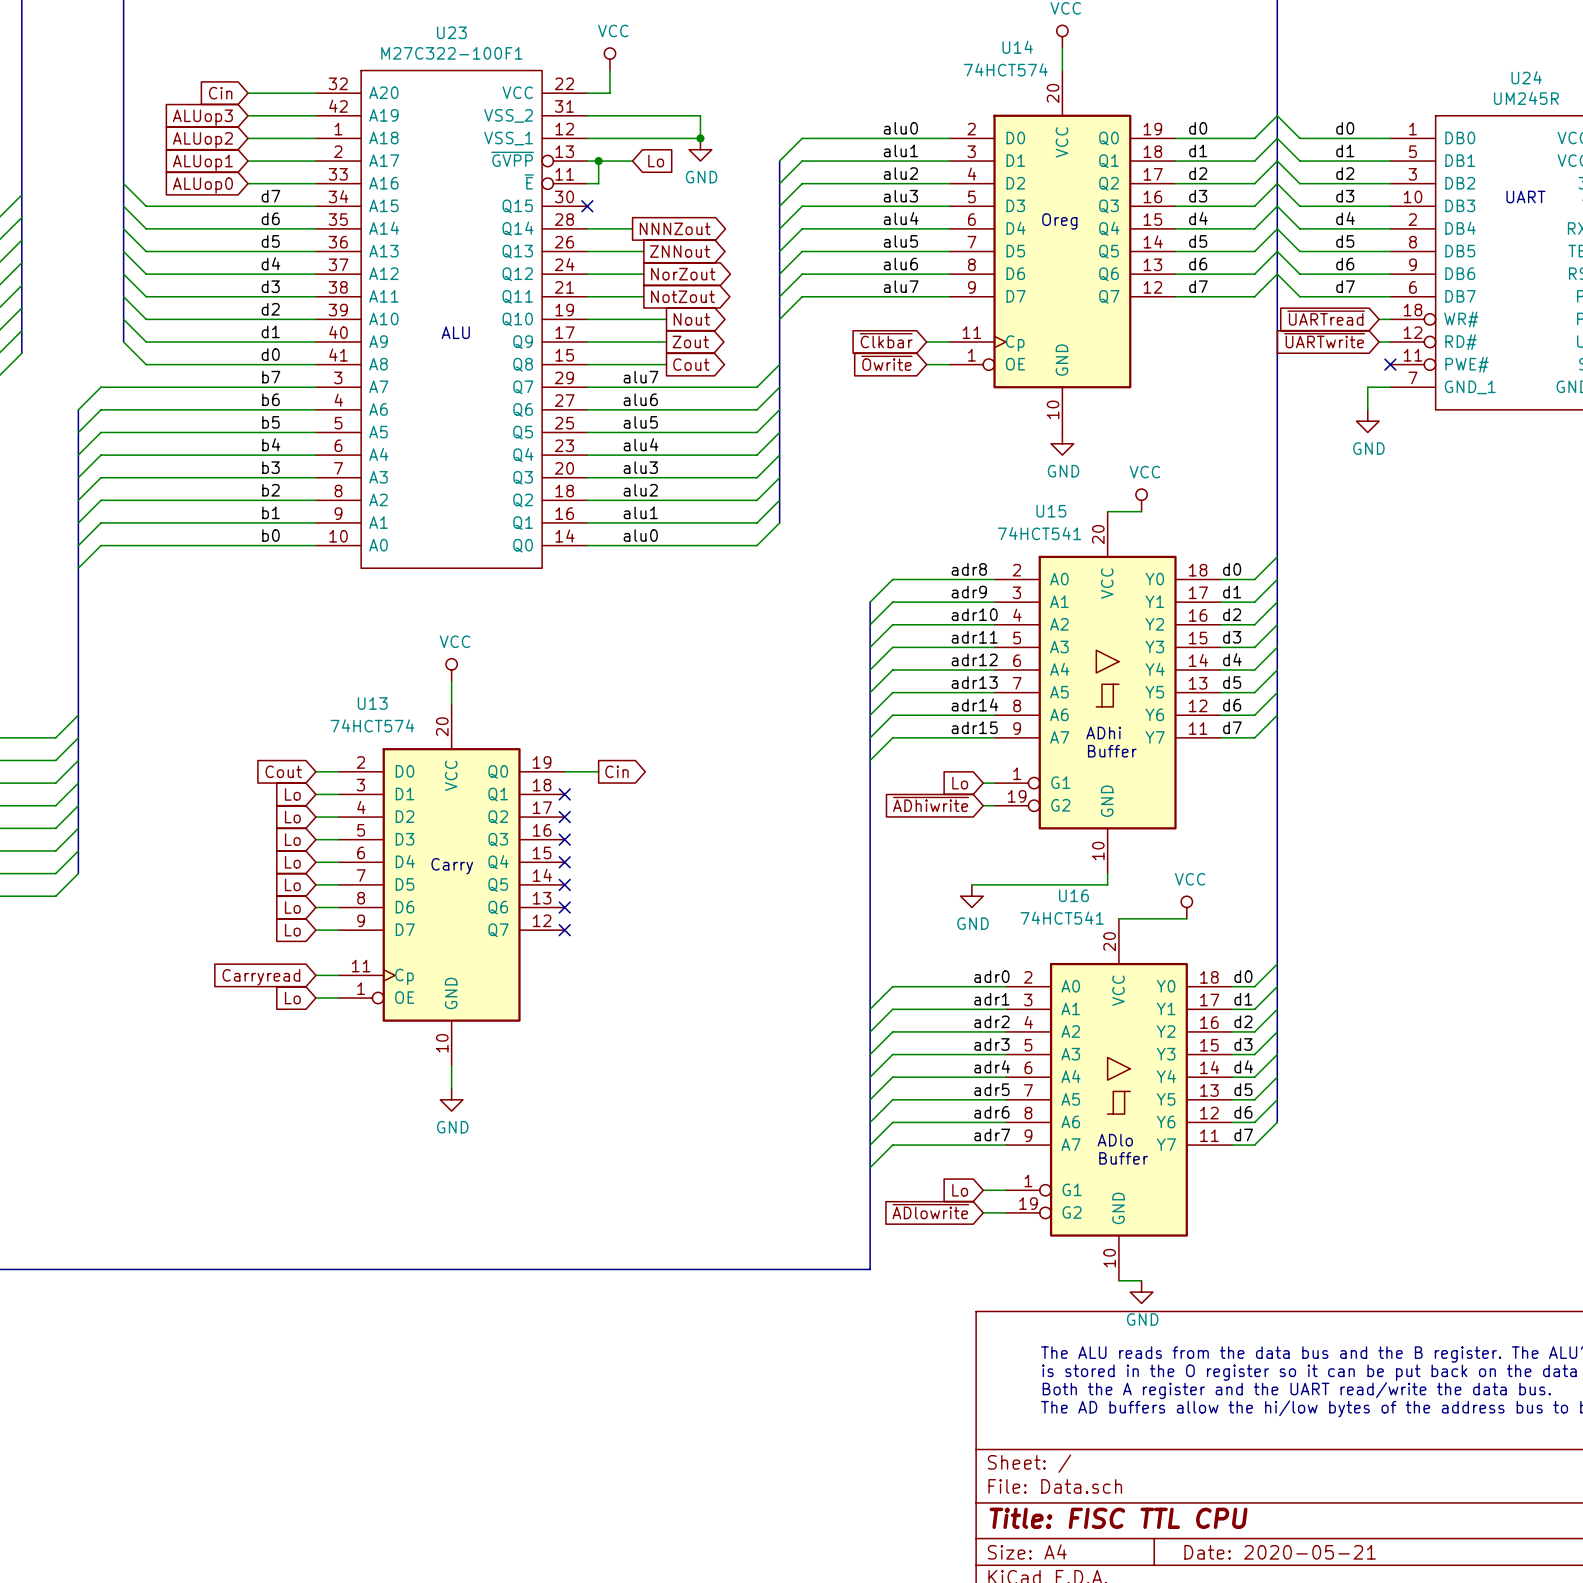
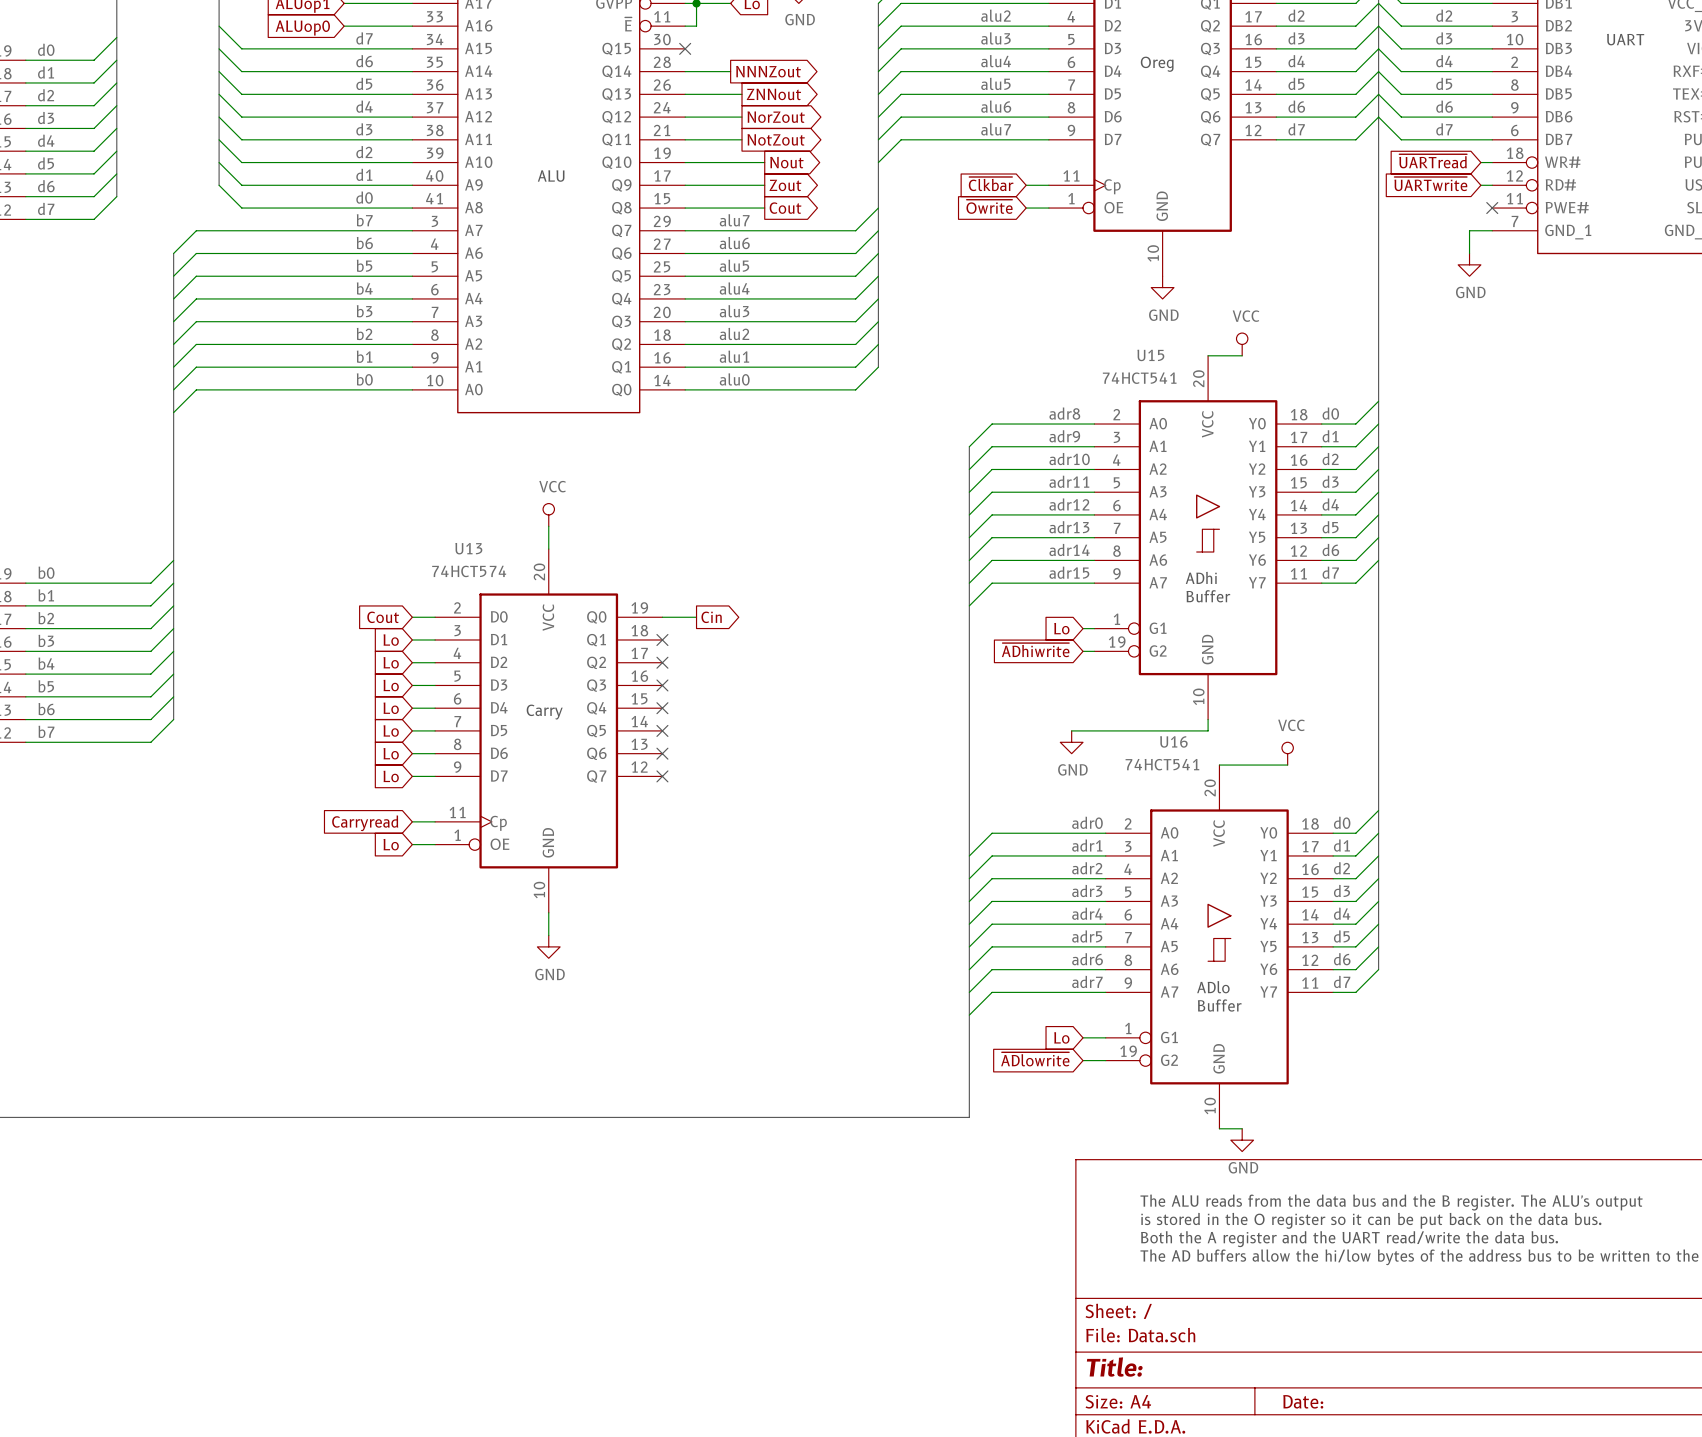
title block: Title: FISC TTL CPU (1118, 1518) -> Title: (1114, 1367)
title block: Date: 2020-05-21 (1280, 1552) -> Date: (1303, 1401)

